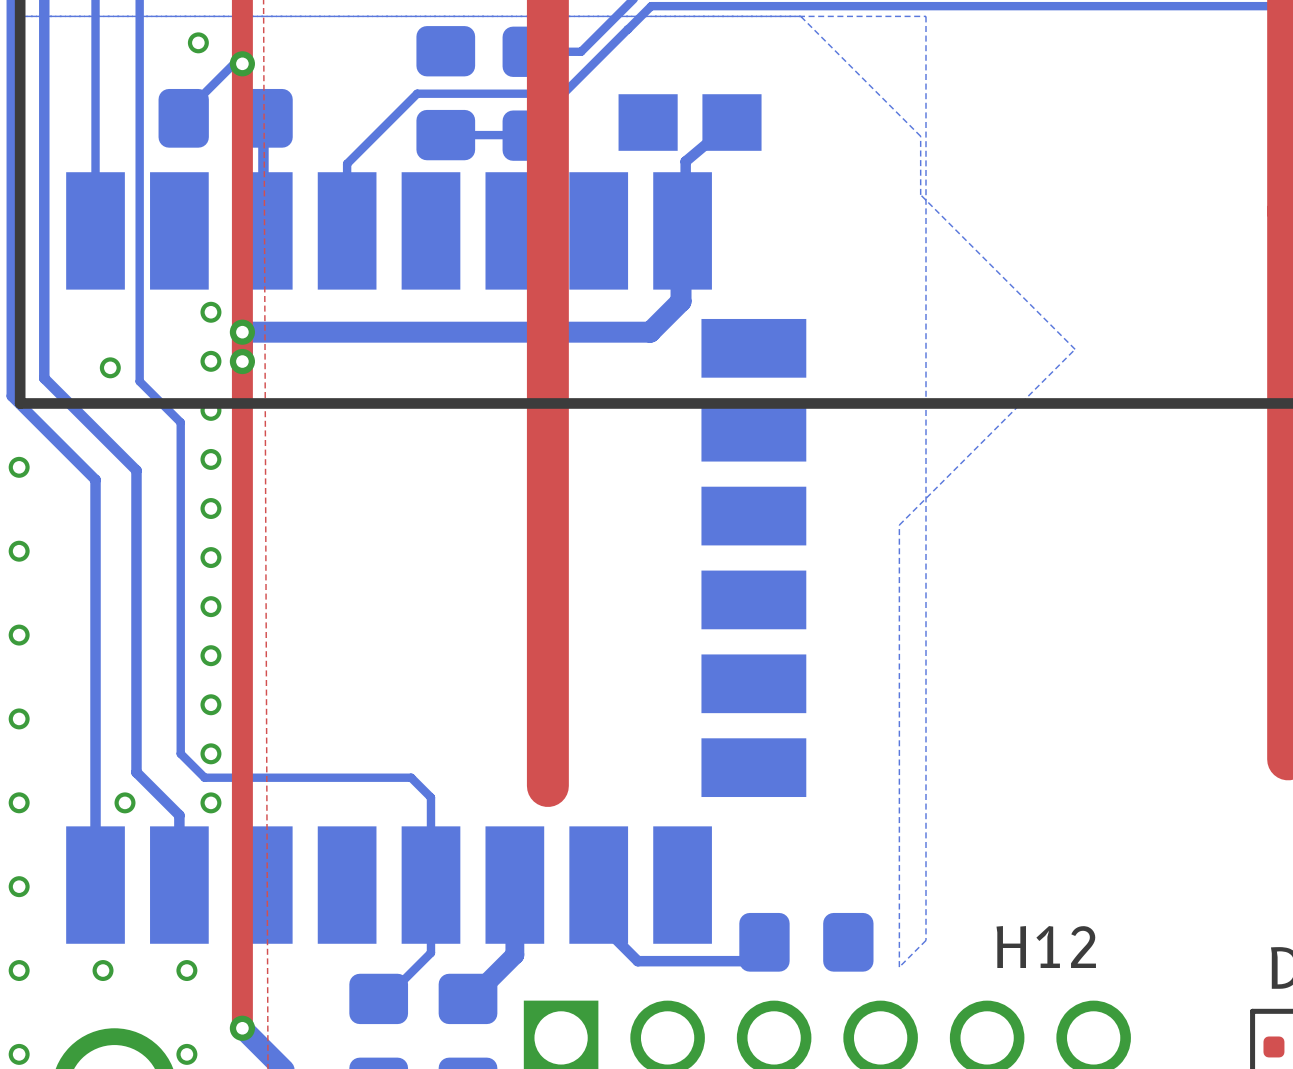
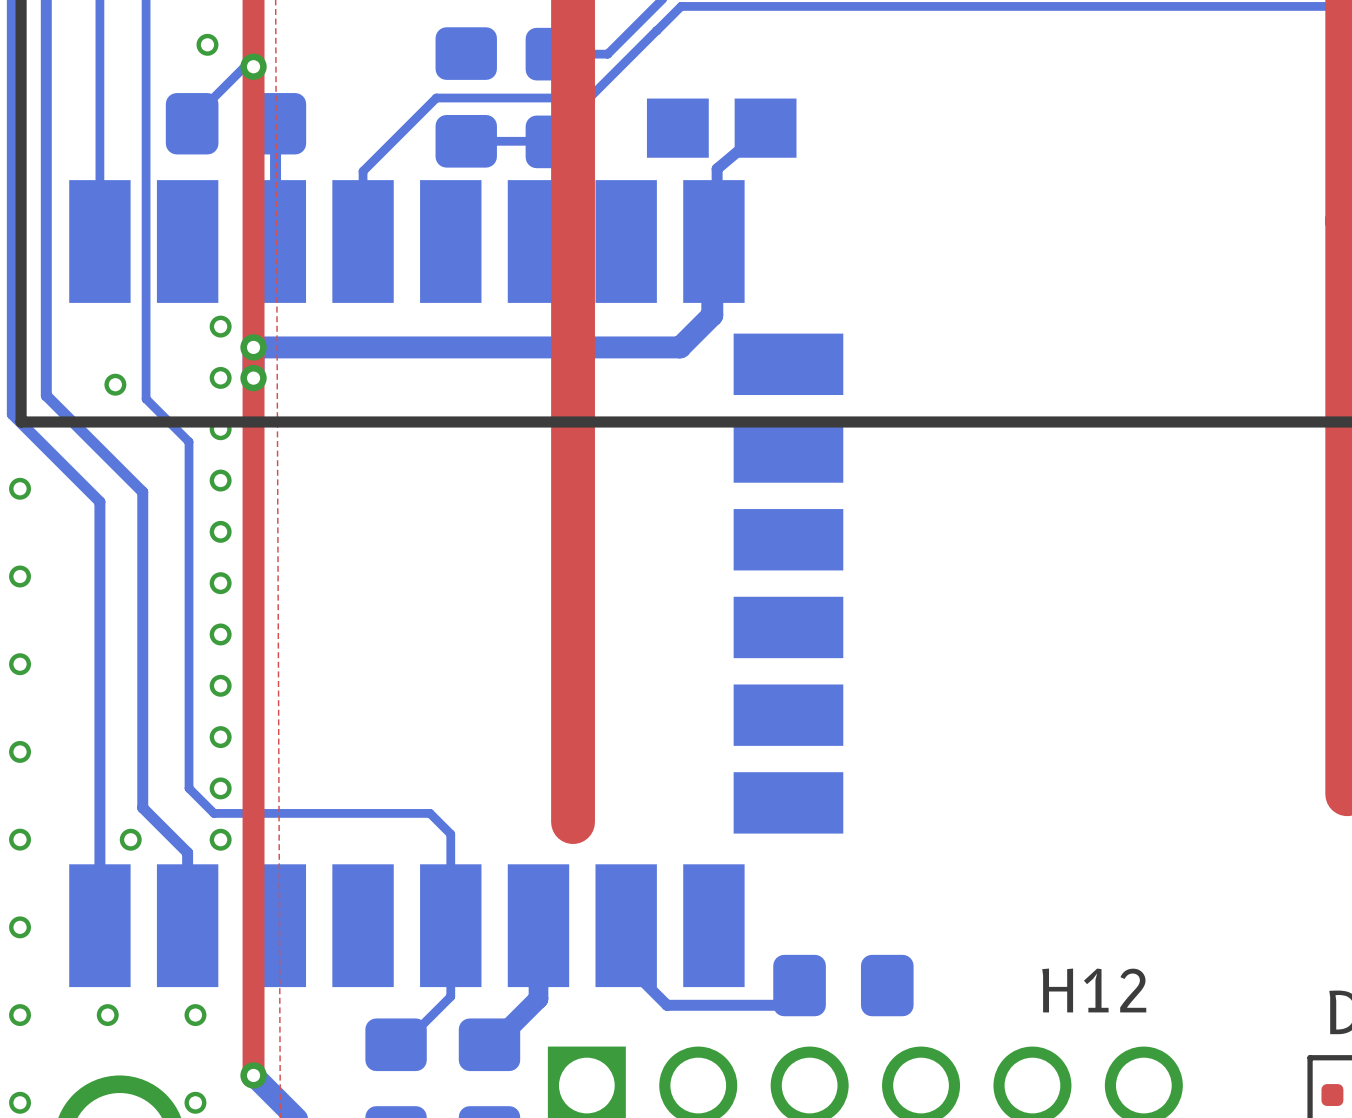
bottom zone outline: (21, 16) (926, 16) (926, 940) (899, 967) (899, 525) (1075, 349) (920, 194) (920, 136) (800, 16) -> none

